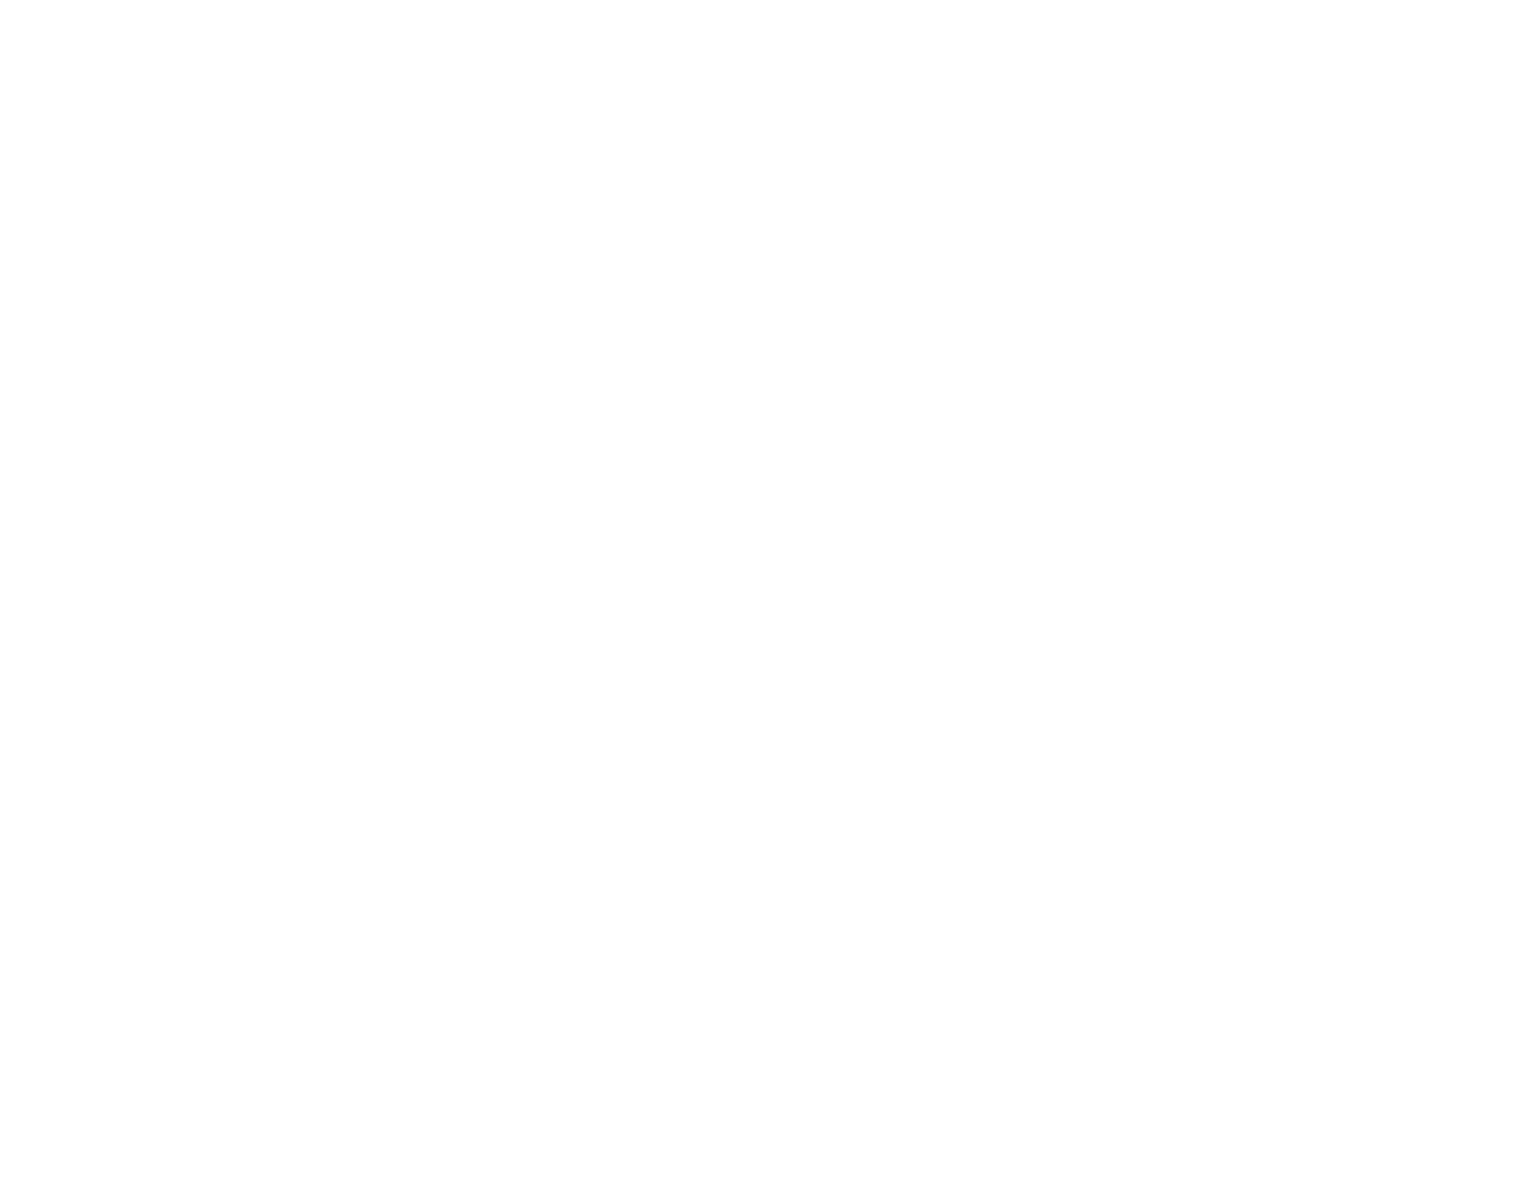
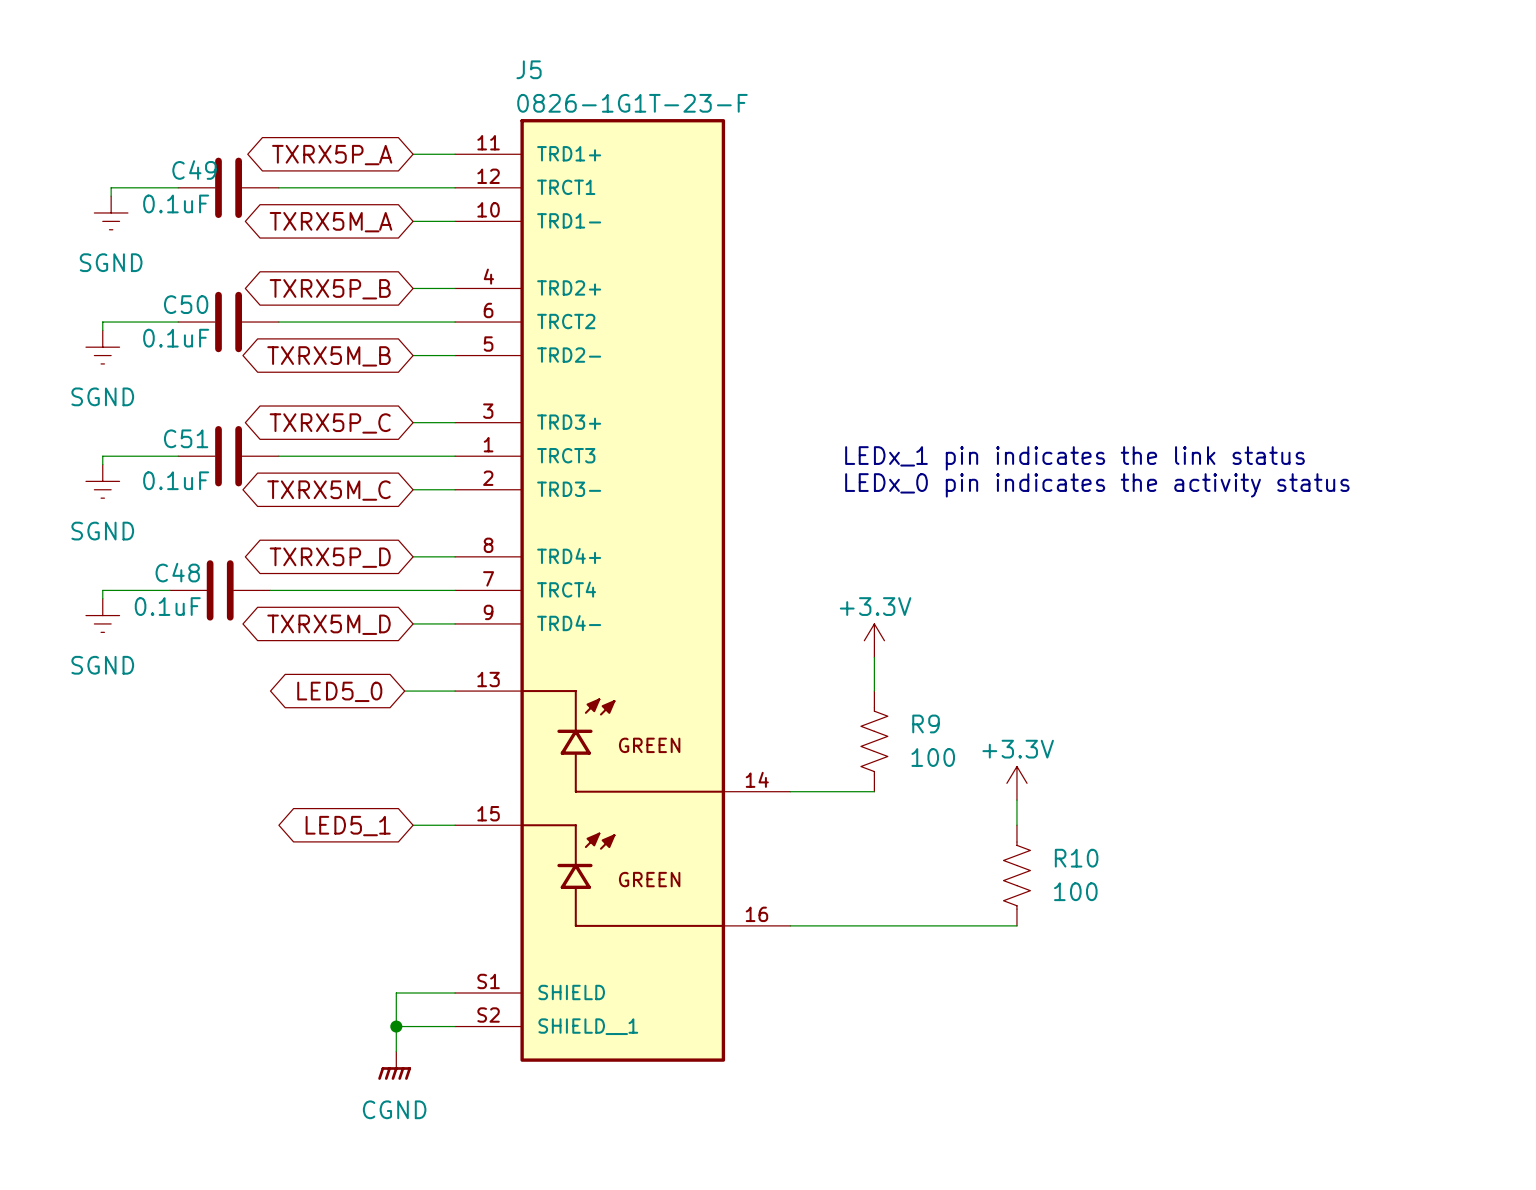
wire: none -> (413, 154) (455, 154)
global label: none -> TXRX5P_A (332, 155)
wire: none -> (178, 187) (111, 187) (111, 196)
C49: none -> 0.1uF (228, 187)
wire: none -> (278, 187) (455, 187)
power symbol: none -> SGND (111, 212)
wire: none -> (413, 221) (455, 221)
global label: none -> TXRX5M_A (330, 222)
wire: none -> (413, 288) (455, 288)
global label: none -> TXRX5P_B (330, 289)
wire: none -> (178, 322) (102, 322) (102, 330)
C50: none -> 0.1uF (228, 322)
wire: none -> (278, 322) (455, 322)
power symbol: none -> SGND (102, 347)
wire: none -> (413, 355) (455, 355)
global label: none -> TXRX5M_B (328, 356)
wire: none -> (413, 422) (455, 422)
global label: none -> TXRX5P_C (330, 423)
wire: none -> (178, 456) (102, 456) (102, 464)
C51: none -> 0.1uF (228, 456)
wire: none -> (278, 456) (455, 456)
text: none -> LEDx_1 pin indicates the link status (1075, 458)
power symbol: none -> SGND (102, 481)
text: none -> LEDx_0 pin indicates the activity status (1097, 485)
wire: none -> (413, 489) (455, 489)
global label: none -> TXRX5M_C (328, 490)
wire: none -> (413, 556) (455, 556)
global label: none -> TXRX5P_D (330, 557)
wire: none -> (169, 590) (102, 590) (102, 598)
C48: none -> 0.1uF (220, 590)
wire: none -> (270, 590) (455, 590)
J5: none -> 0826-1G1T-23-F (622, 590)
power symbol: none -> SGND (102, 615)
wire: none -> (413, 623) (455, 623)
global label: none -> TXRX5M_D (328, 624)
power symbol: none -> +3.3V (874, 640)
wire: none -> (874, 657) (874, 691)
global label: none -> LED5_0 (339, 691)
wire: none -> (404, 691) (455, 691)
R9: none -> 100 (874, 741)
power symbol: none -> +3.3V (1016, 783)
wire: none -> (790, 791) (874, 791)
wire: none -> (1016, 800) (1016, 825)
wire: none -> (413, 825) (455, 825)
global label: none -> LED5_1 (348, 826)
R10: none -> 100 (1016, 875)
wire: none -> (790, 925) (1016, 925)
wire: none -> (455, 993) (396, 993) (396, 1051)
wire: none -> (396, 1026) (455, 1026)
junction: none -> (396, 1026)
power symbol: none -> CGND (394, 1065)

